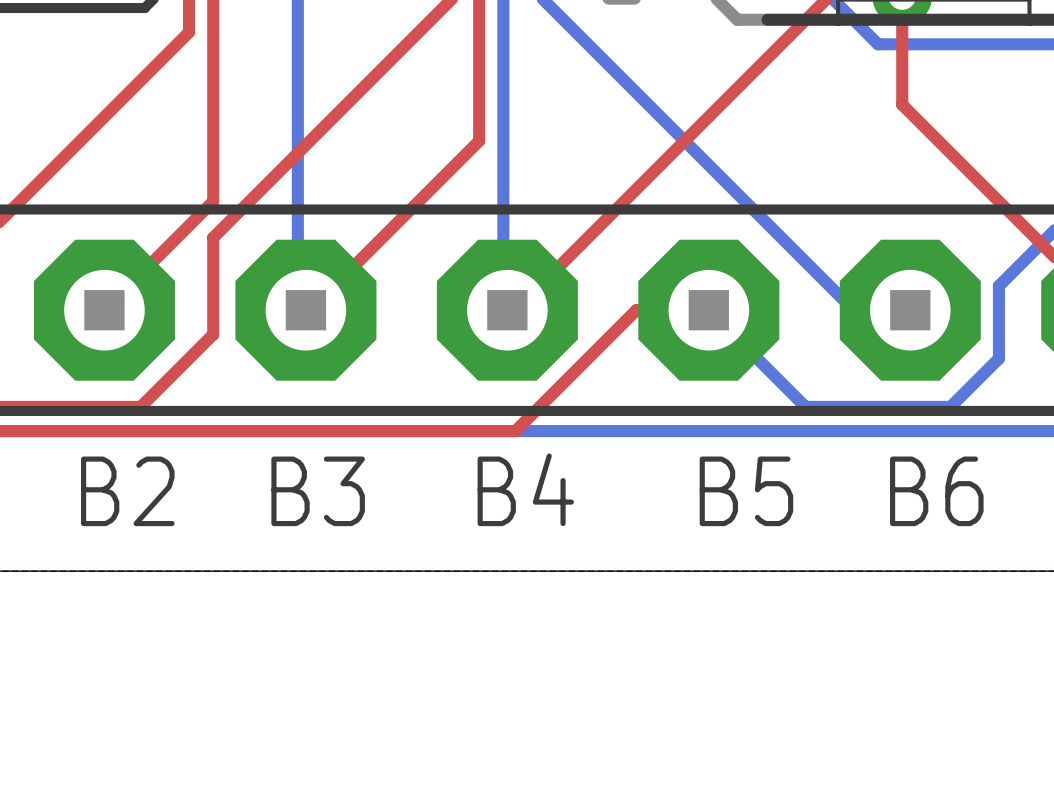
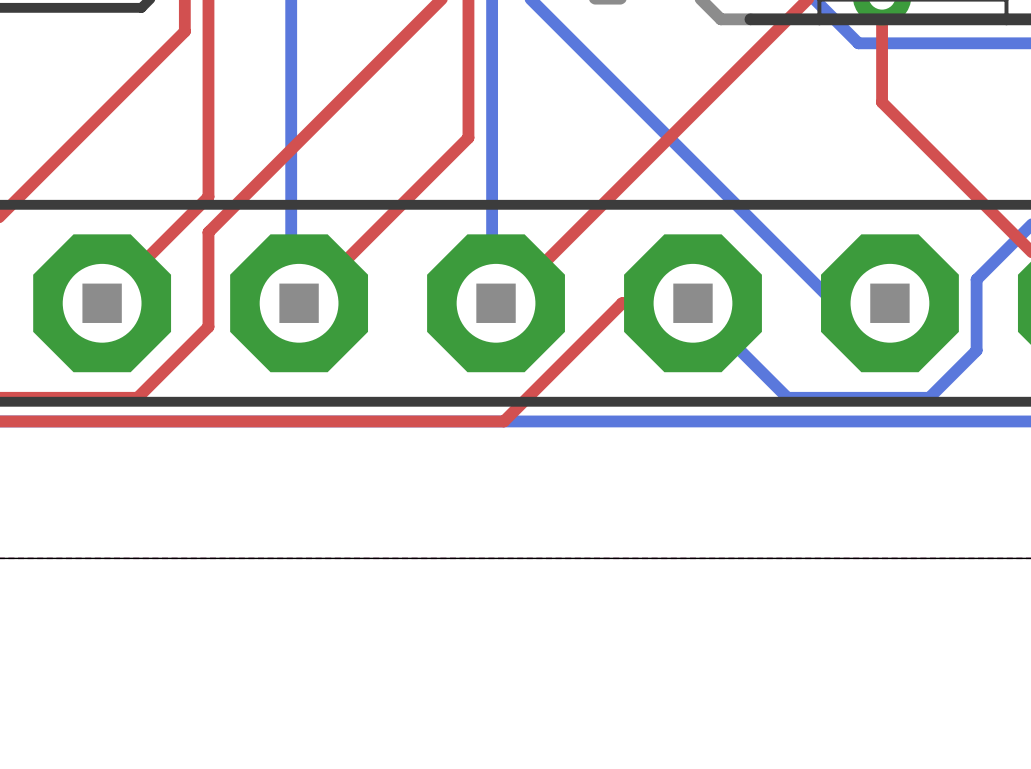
text: B4 (525, 489) -> none
text: B2 (127, 491) -> none
text: B3 (318, 491) -> none
text: B5 (746, 491) -> none
text: B6 (936, 491) -> none

